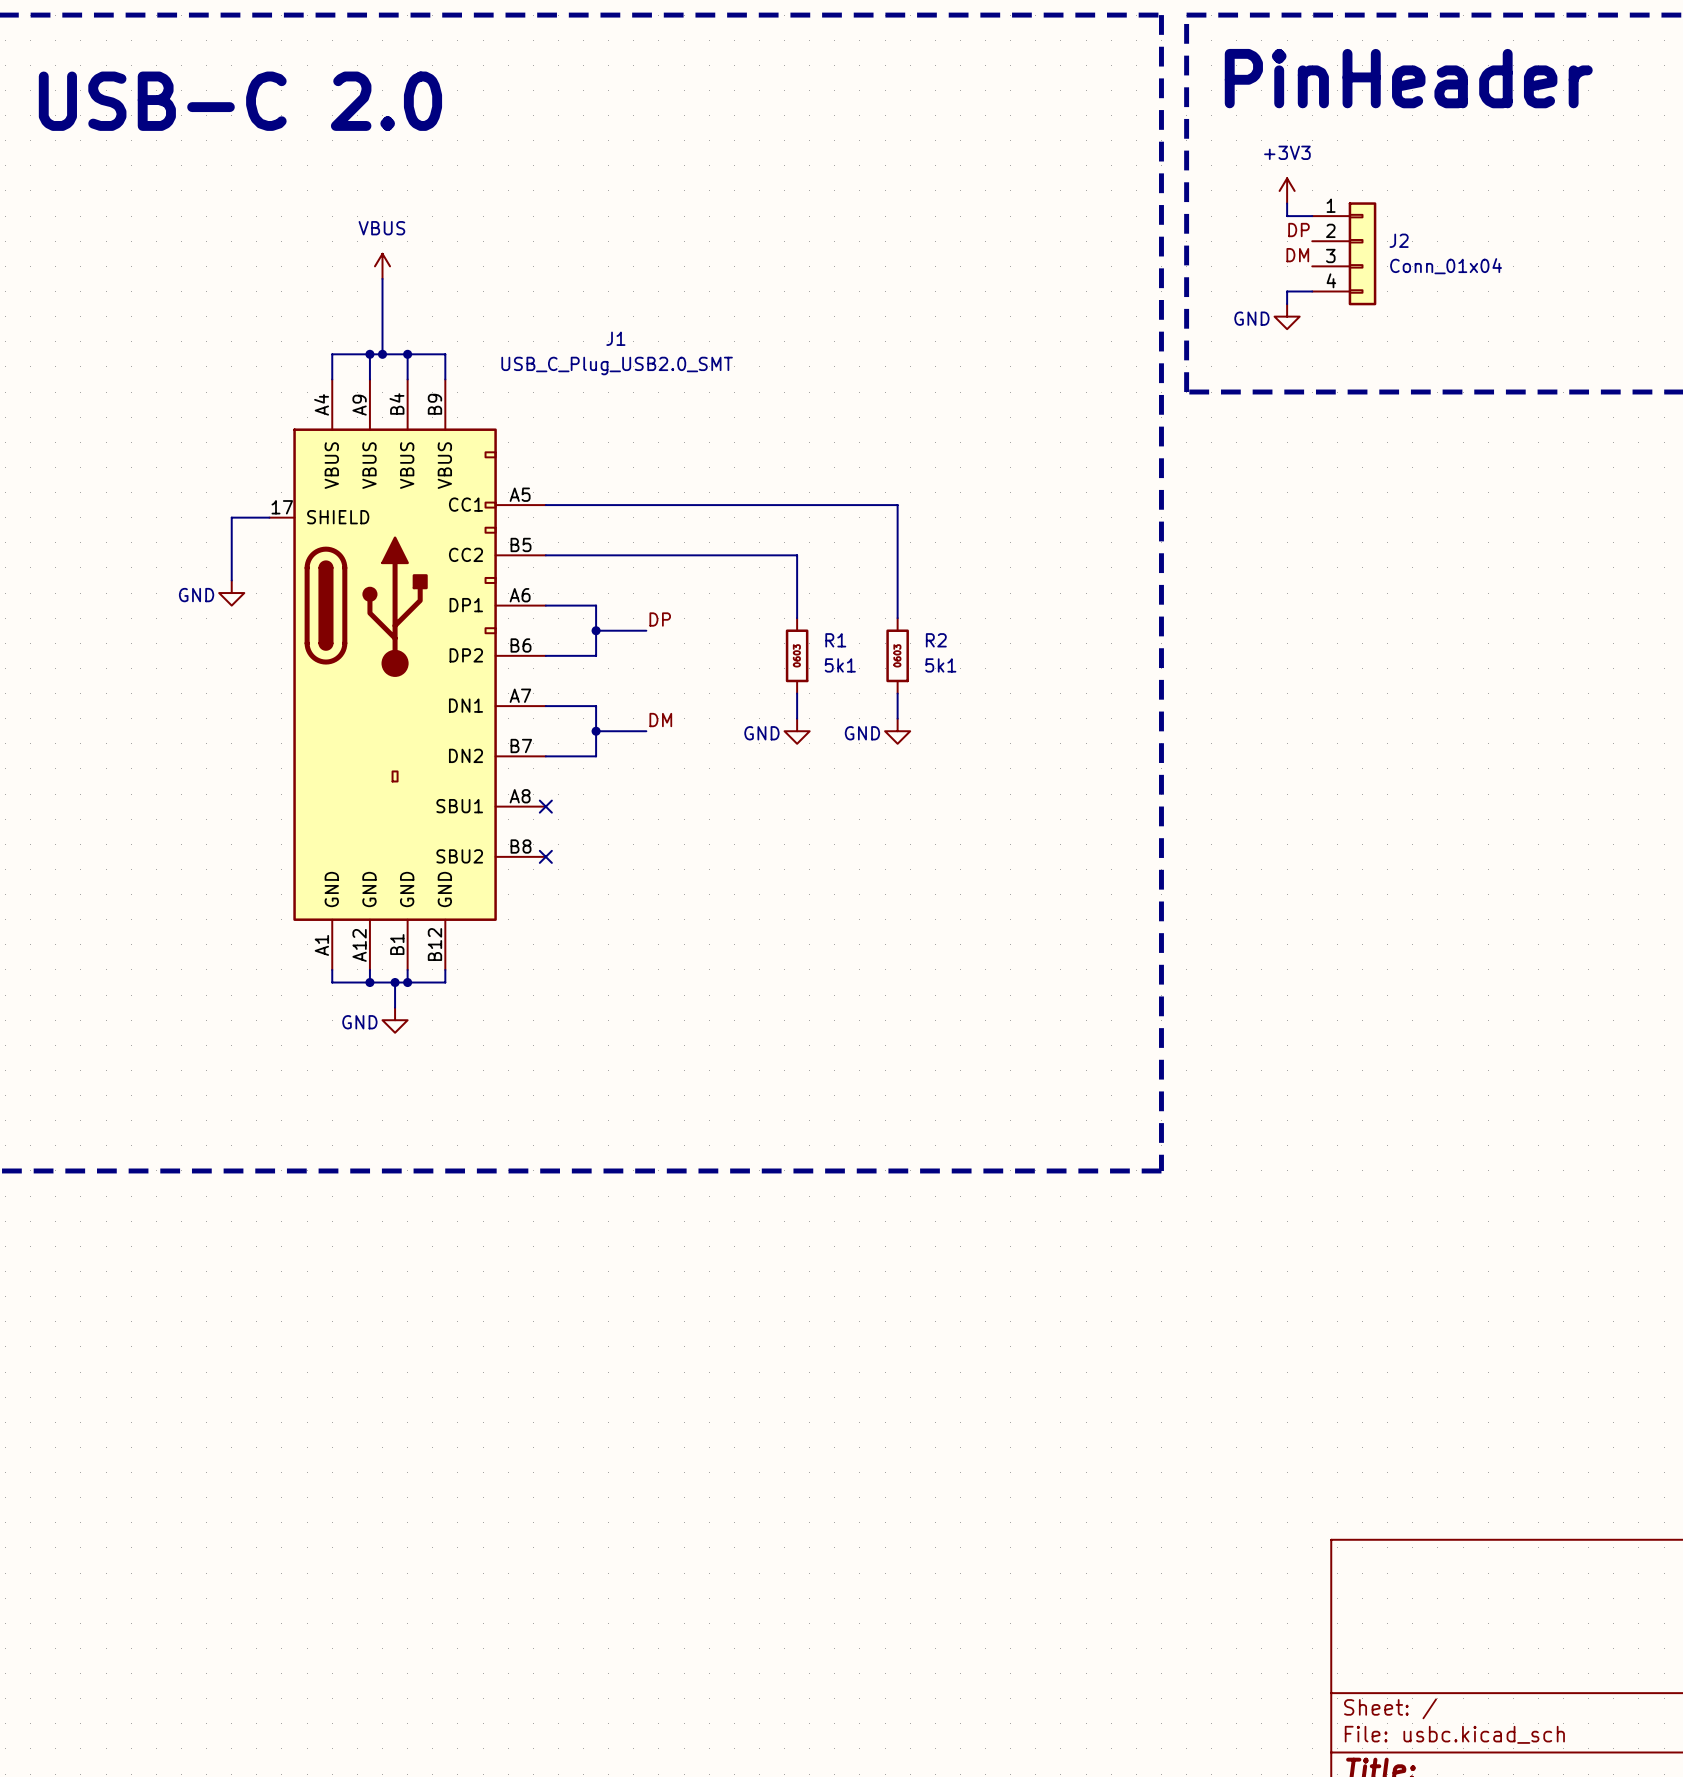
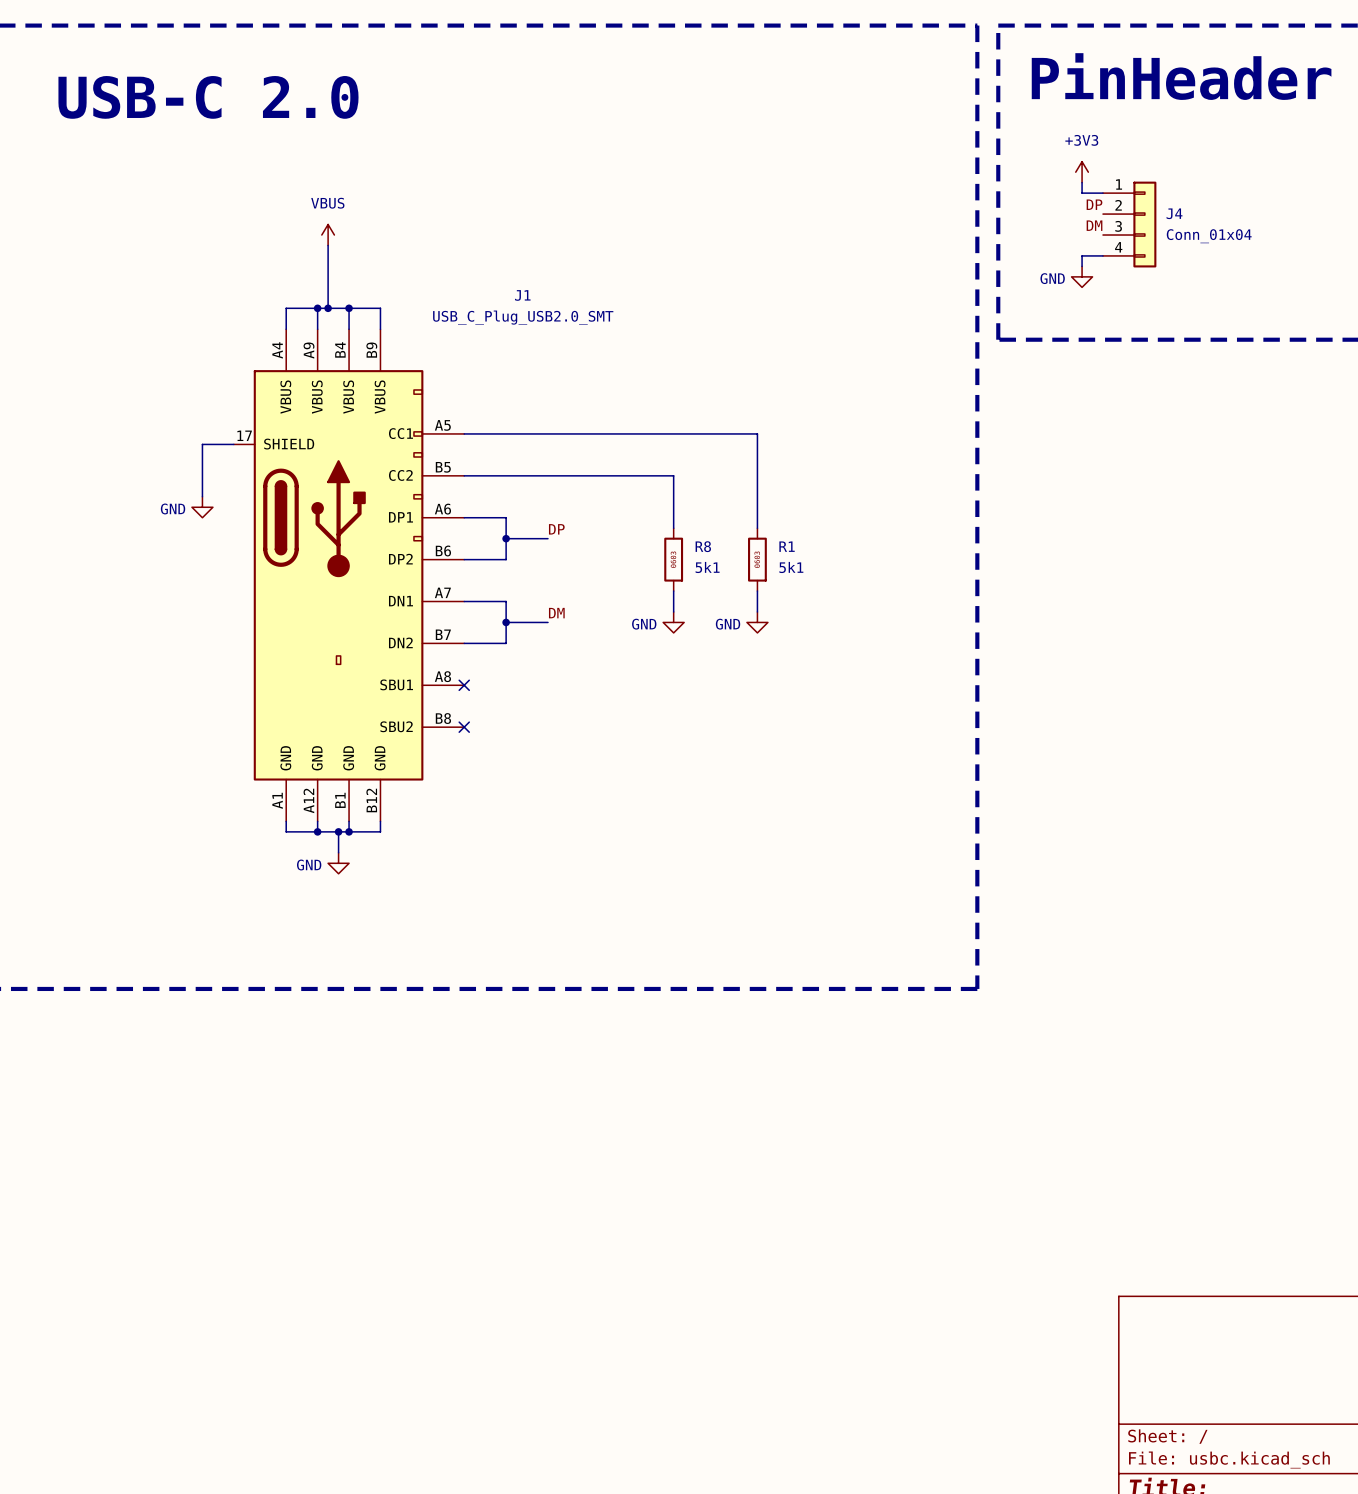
J2 name: J2 (1399, 240) -> J4 (1174, 213)
R1 name: R1 (835, 640) -> R8 (703, 546)
R2 name: R2 (936, 640) -> R1 (787, 546)

